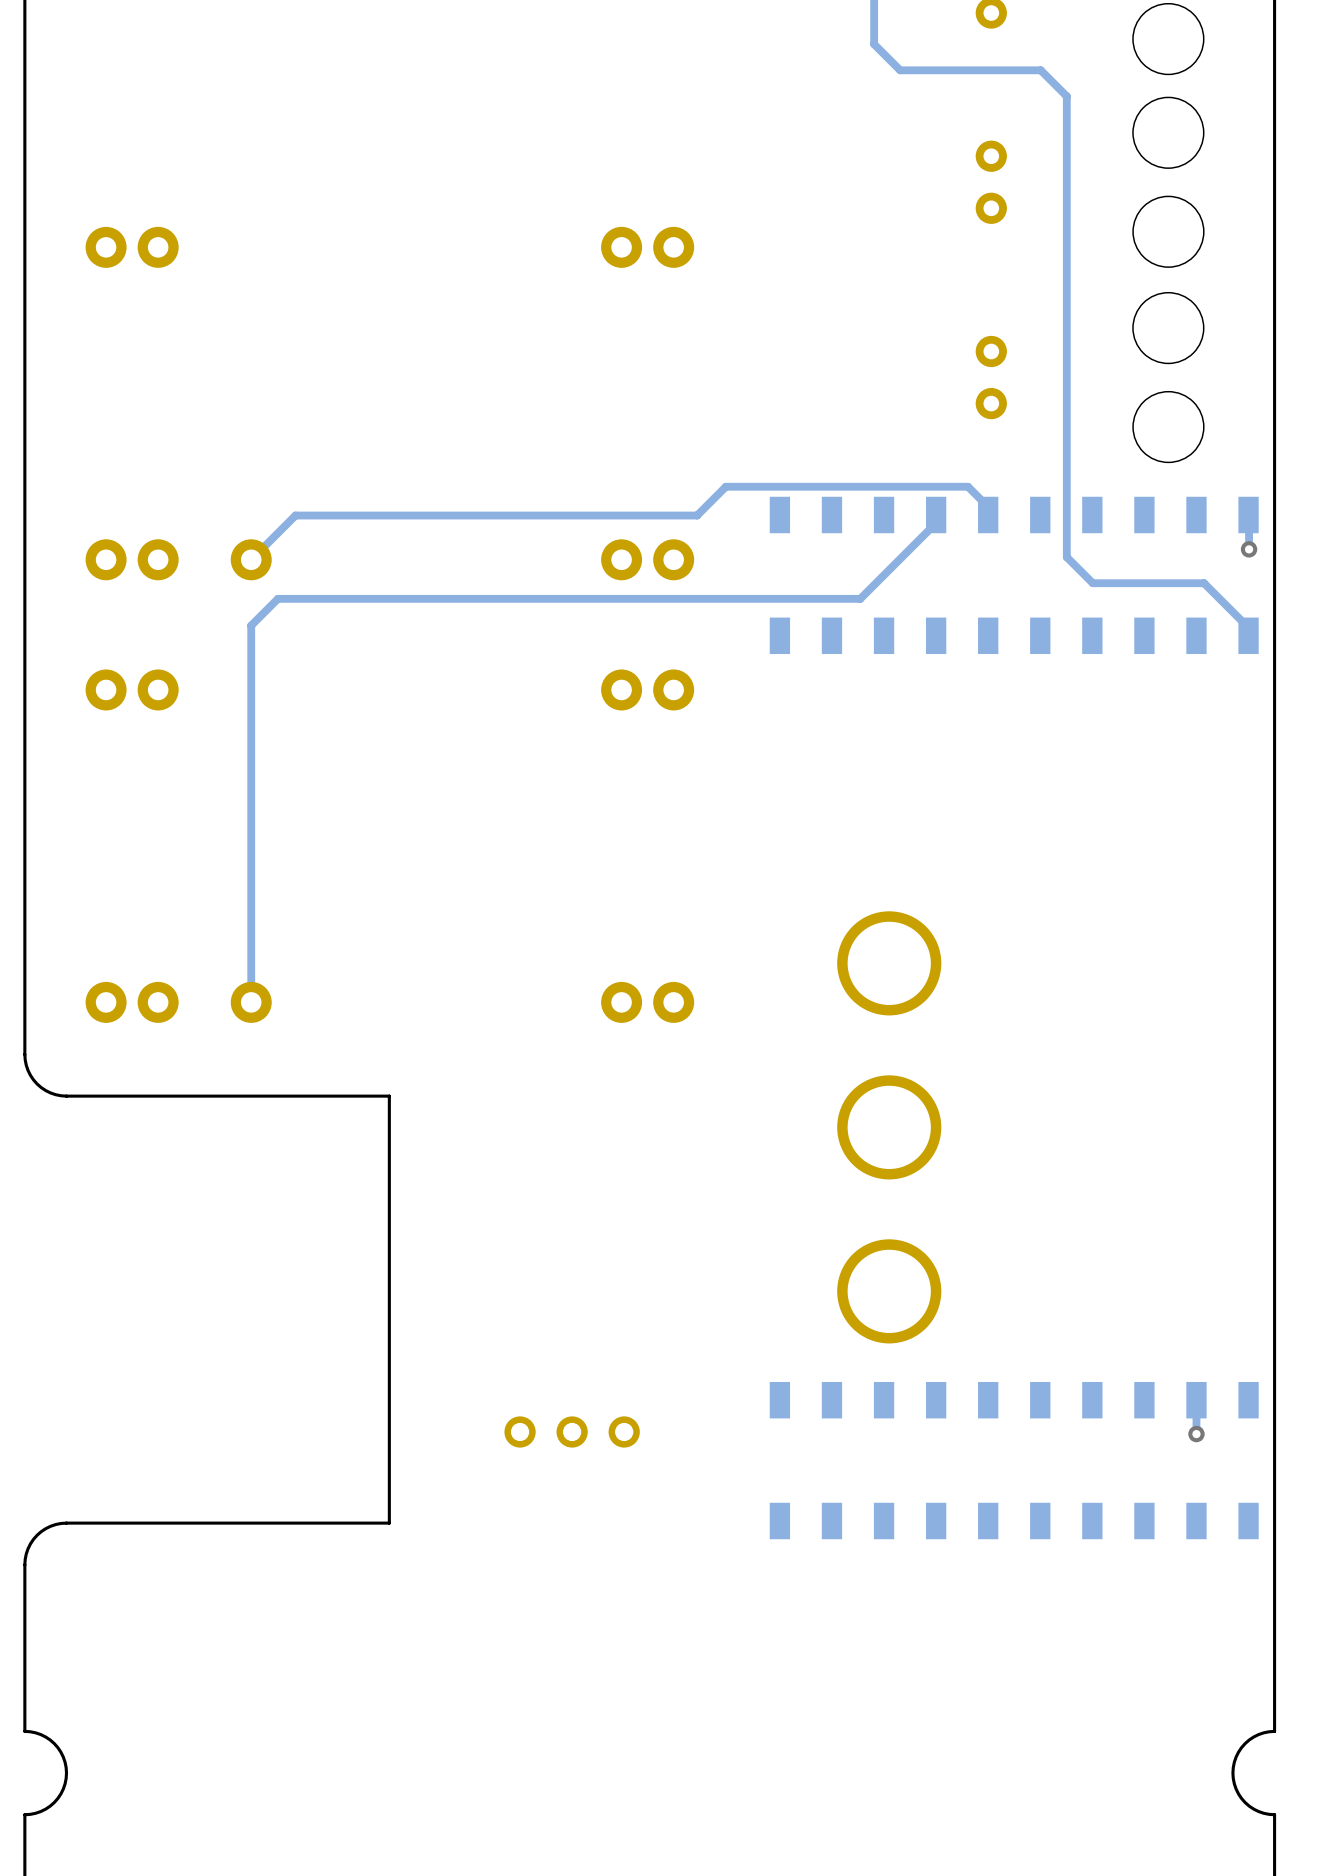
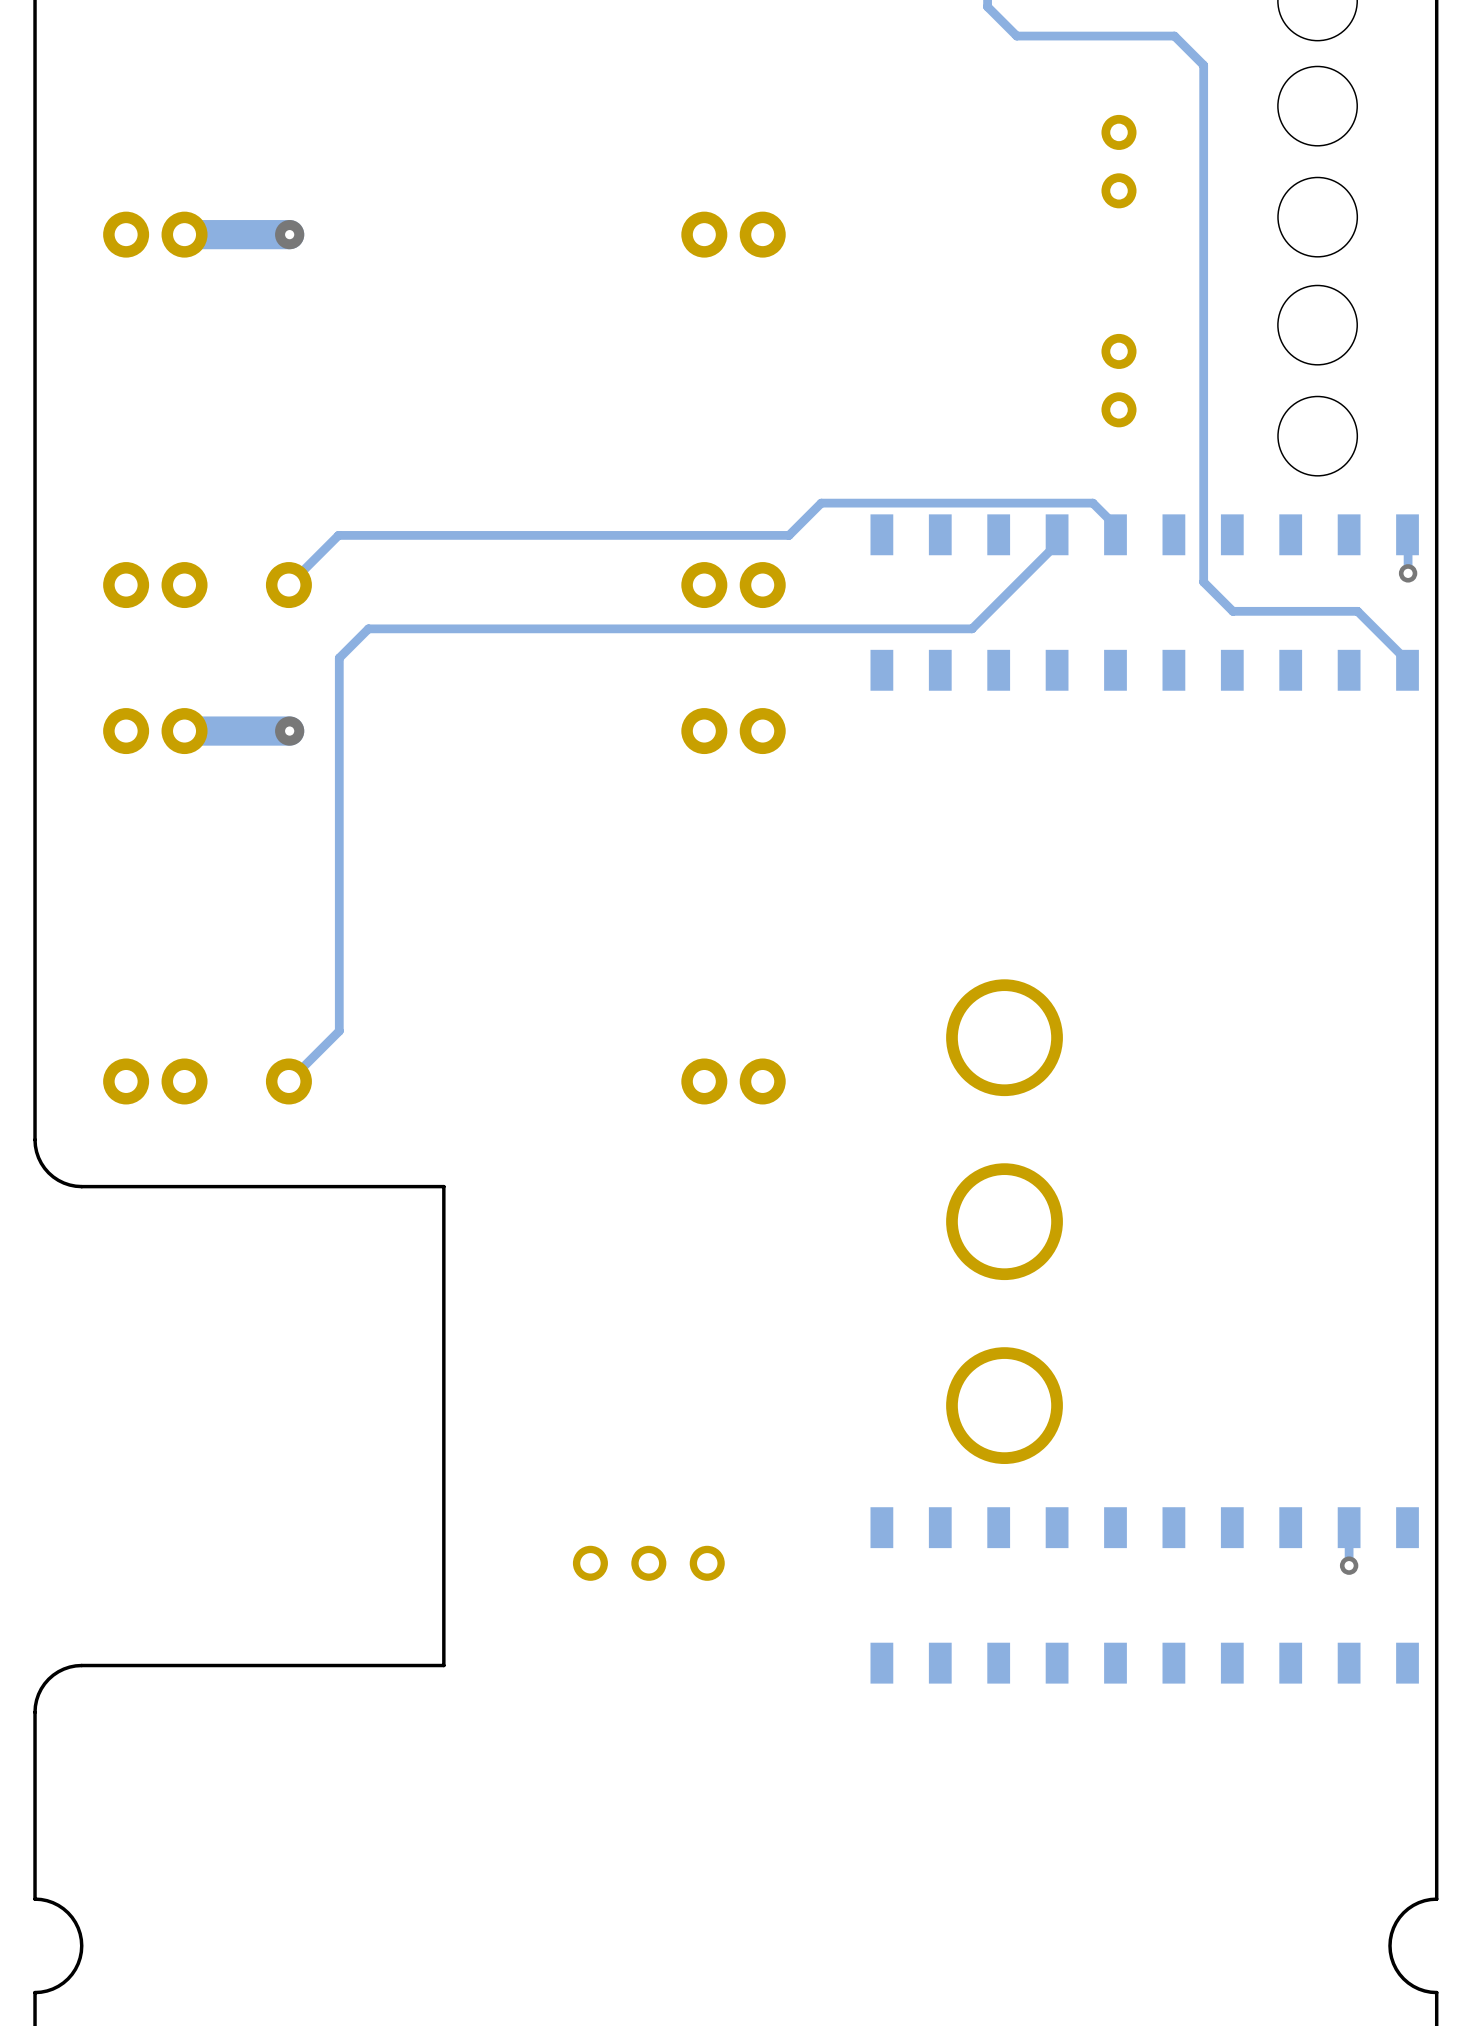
track: none -> (289, 234) (184, 234)
via: none -> (289, 234)
track: (322, 598) (277, 598) (251, 625) (251, 1002) -> (368, 628) (339, 658) (339, 1031) (288, 1081)
track: none -> (289, 731) (184, 731)
via: none -> (289, 731)

